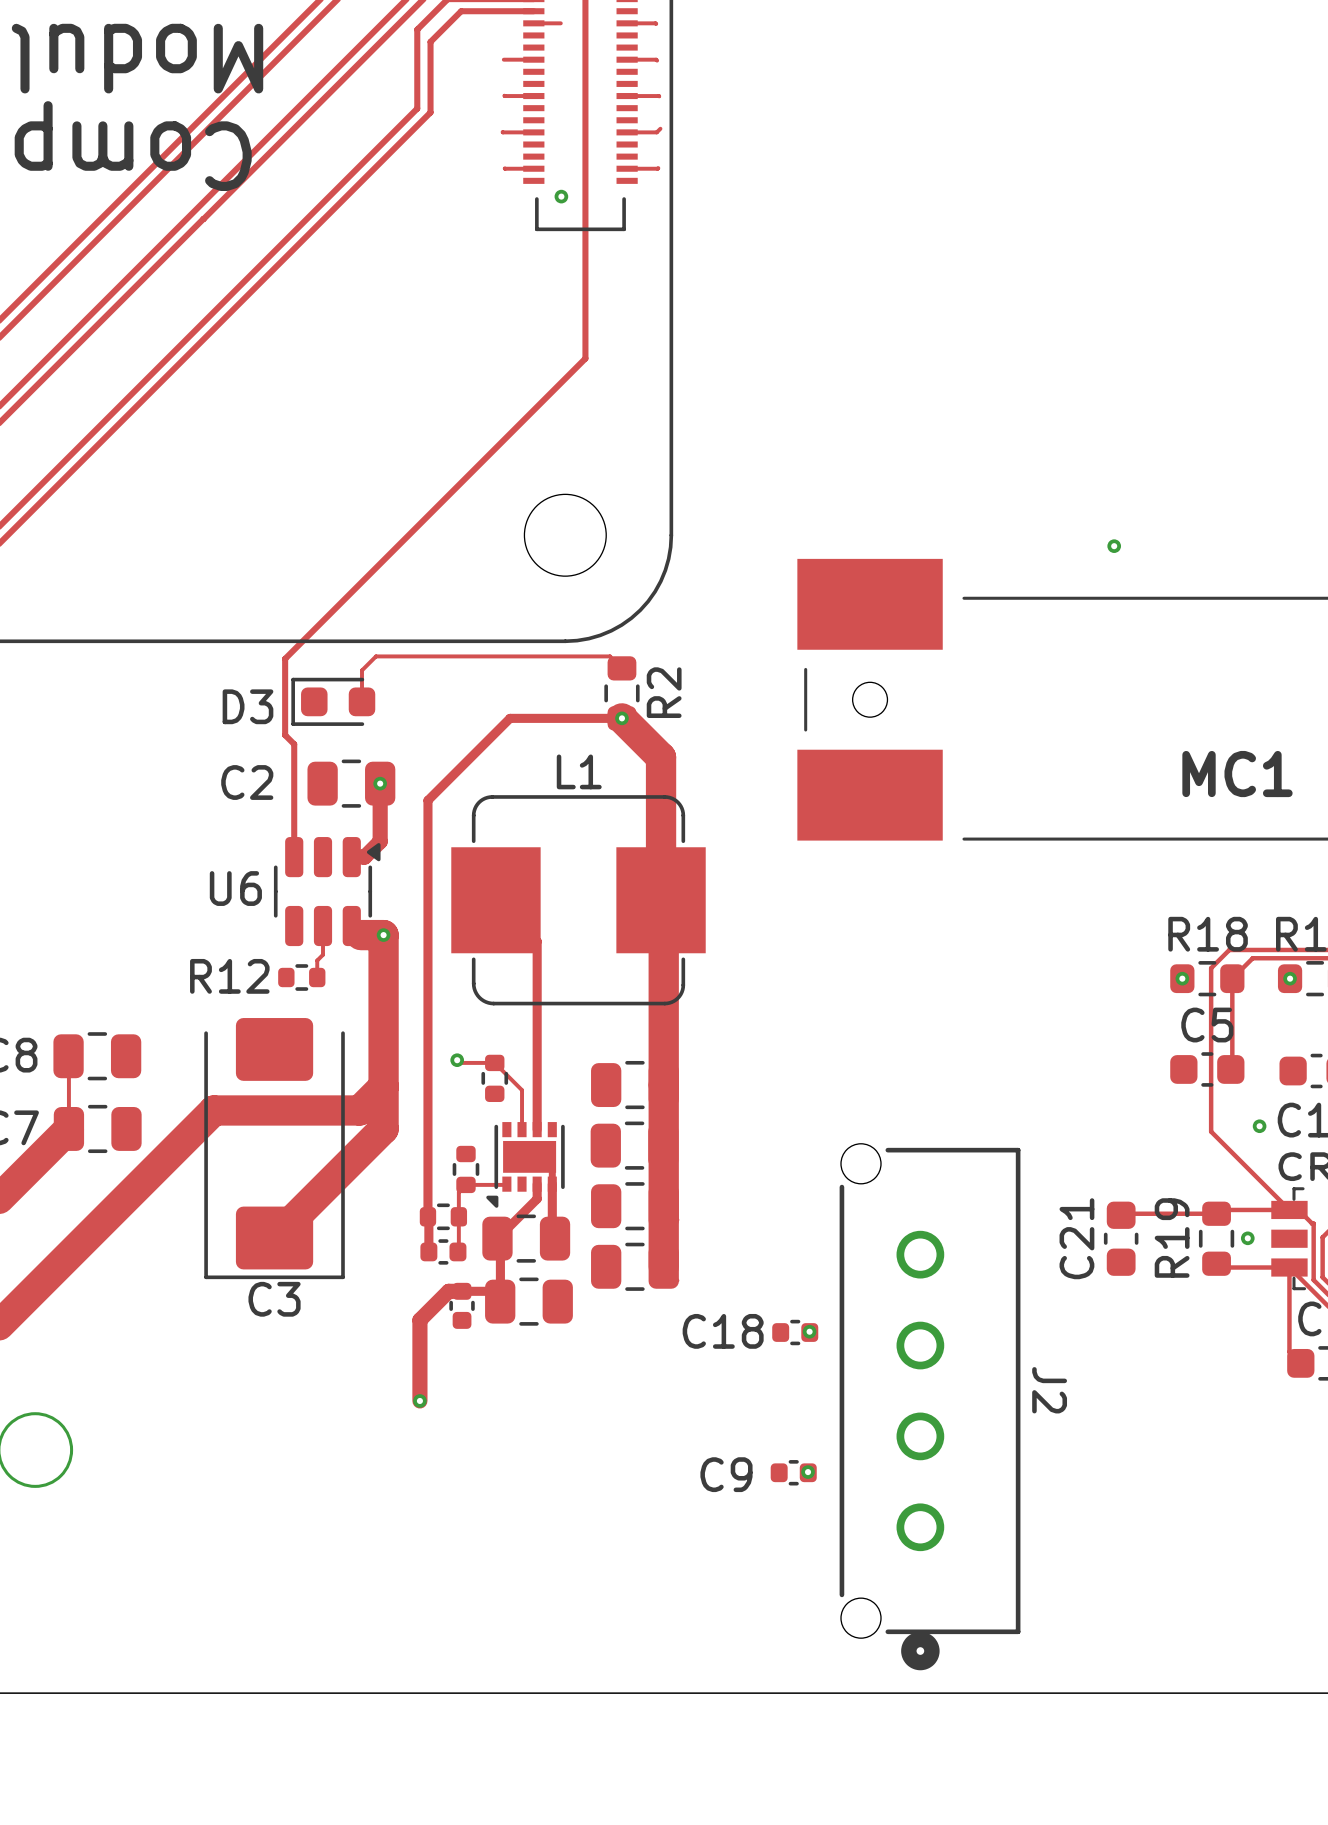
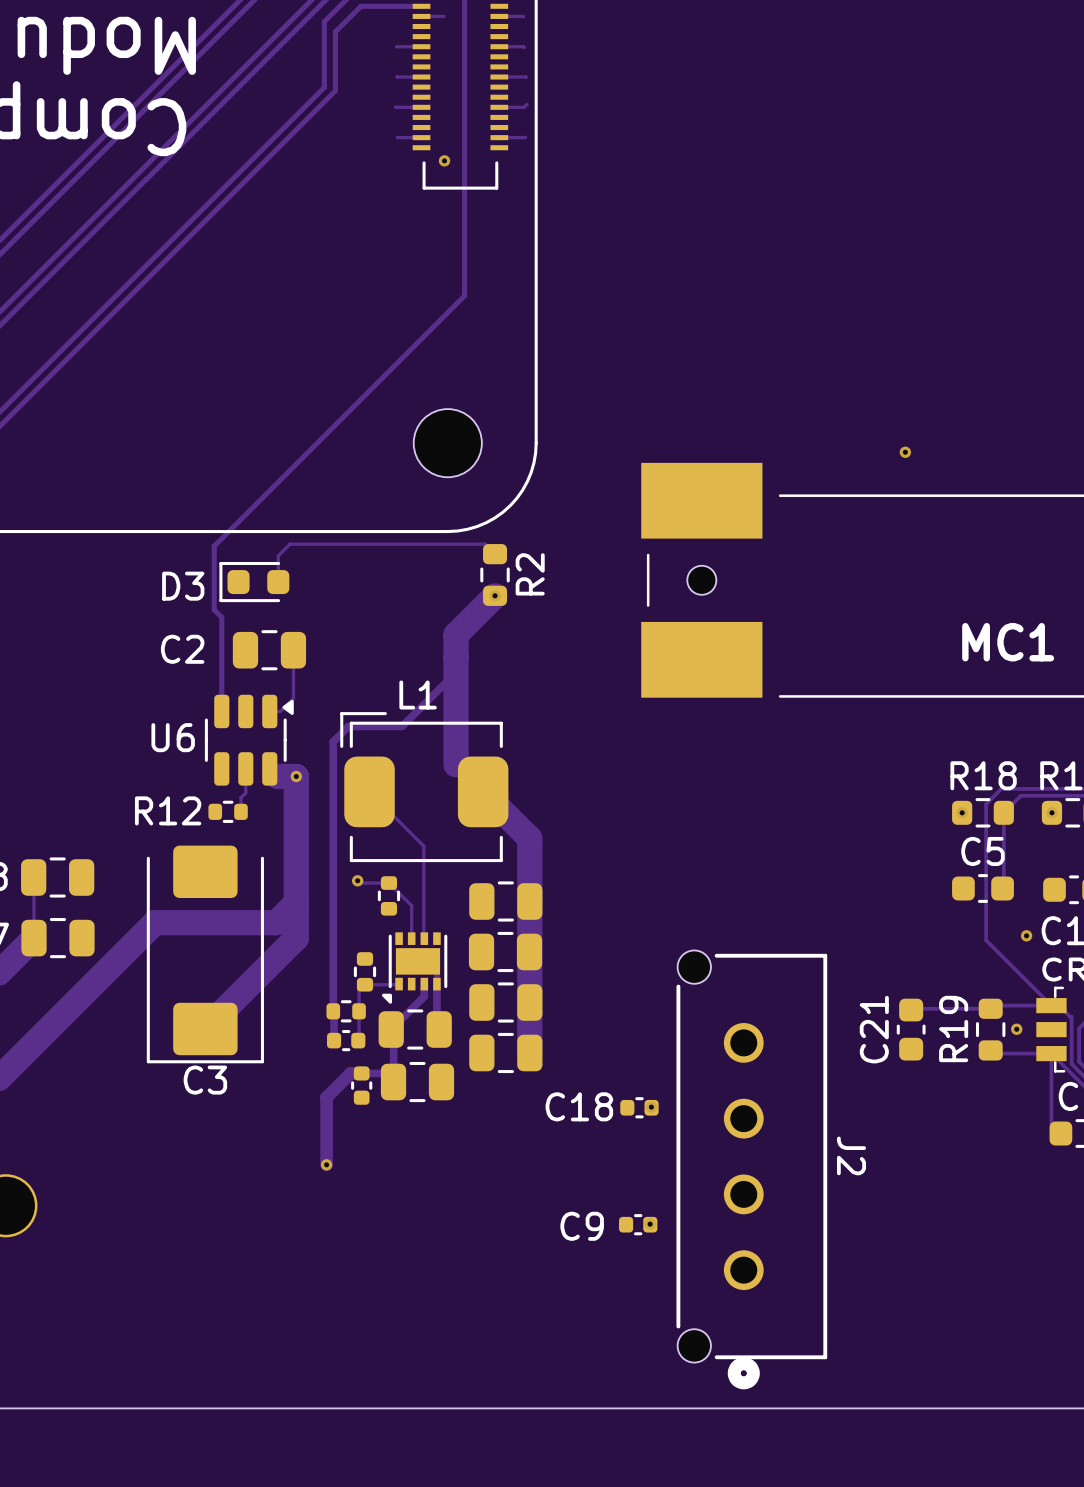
track: none -> (495, 595) (456, 634) (456, 764) (529, 838)
track width: thick (380, 783) (380, 841) (364, 857) (351, 857) -> thin (293, 650) (293, 698) (280, 711) (269, 711)
via: (380, 783) -> none
L1 footprint: [451, 795, 706, 1006] -> [340, 712, 509, 863]
track: (427, 893) (427, 800) (510, 718) (621, 718) (661, 757) (661, 900) (663, 902) (663, 1009) -> (333, 741) (348, 726) (402, 726) (456, 672)
track: (495, 900) (537, 941) (537, 1129) -> (369, 791) (423, 846) (423, 938)

